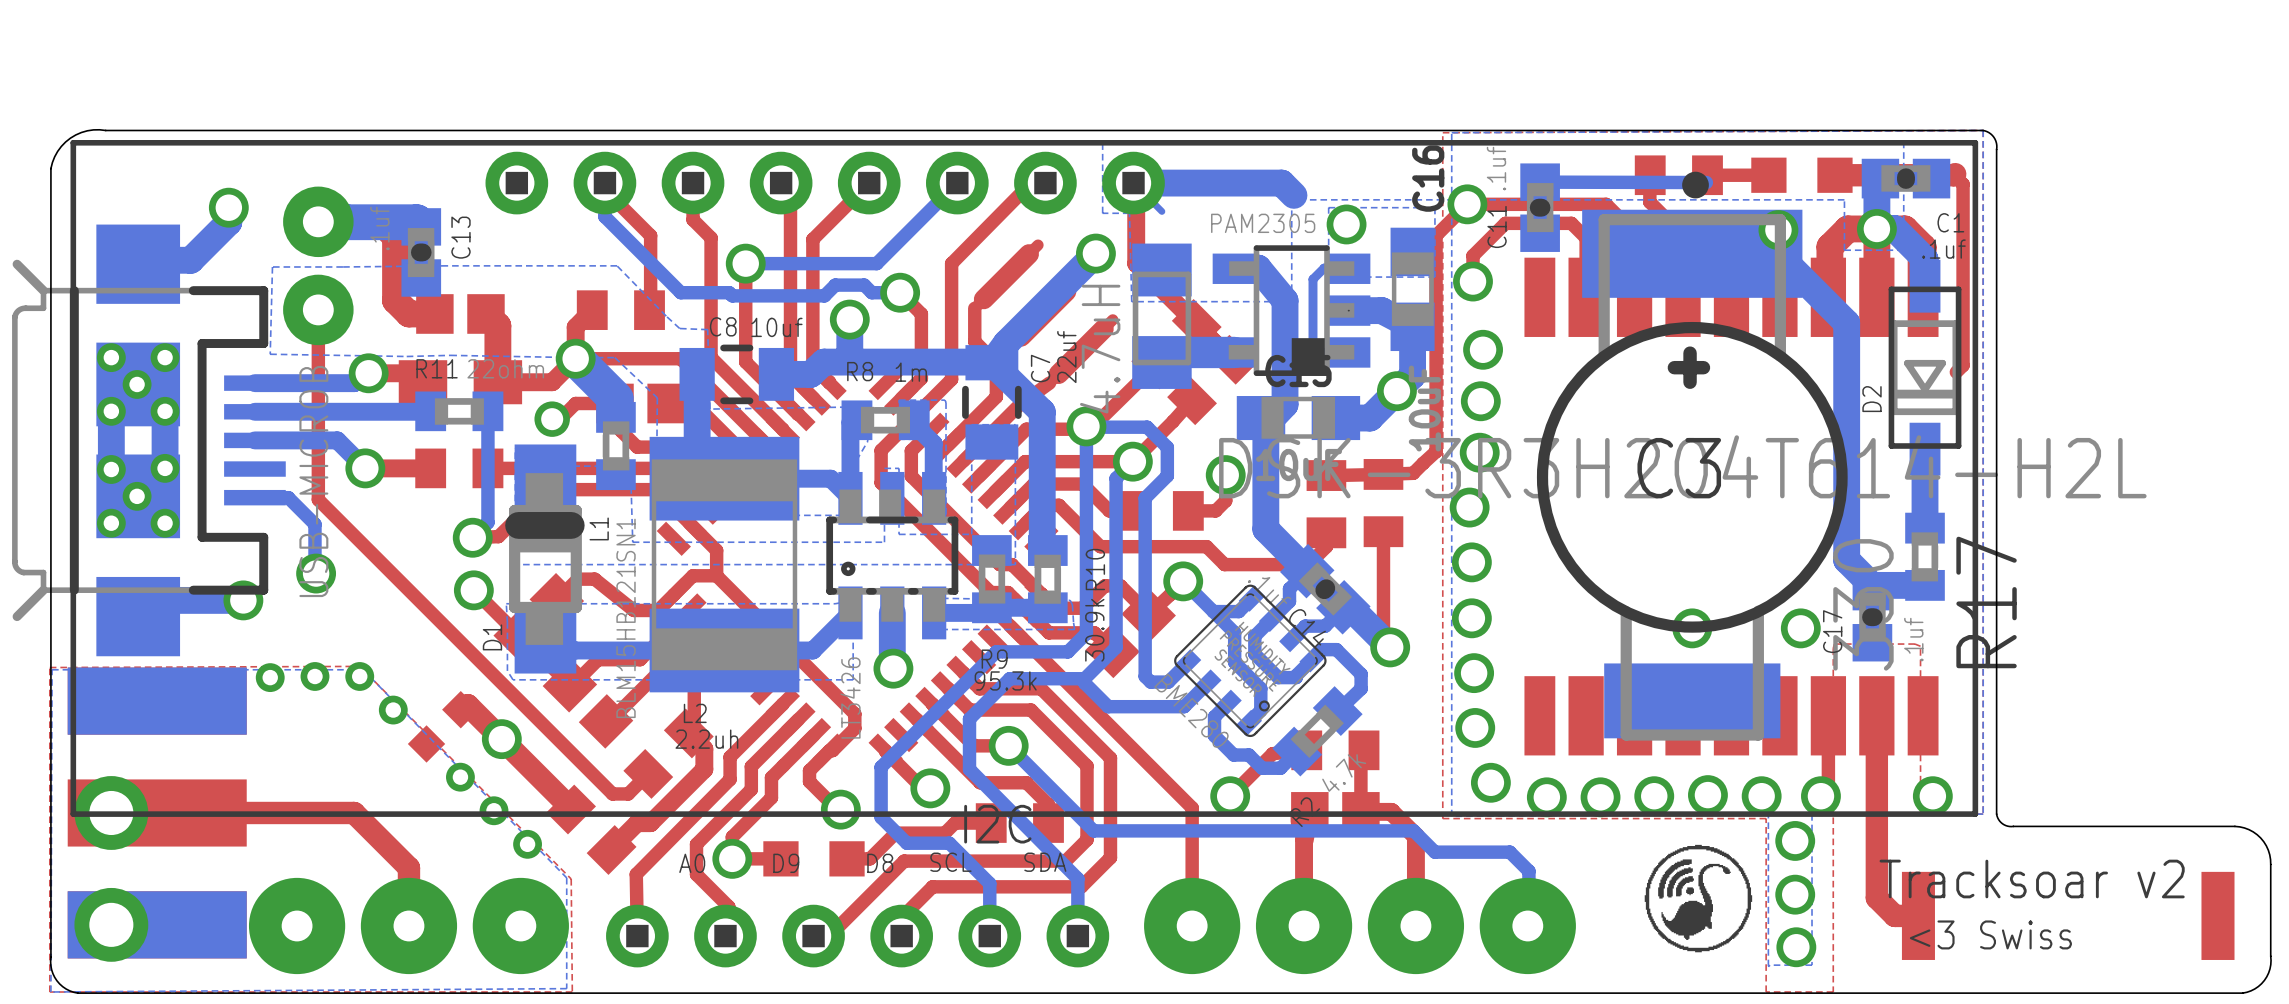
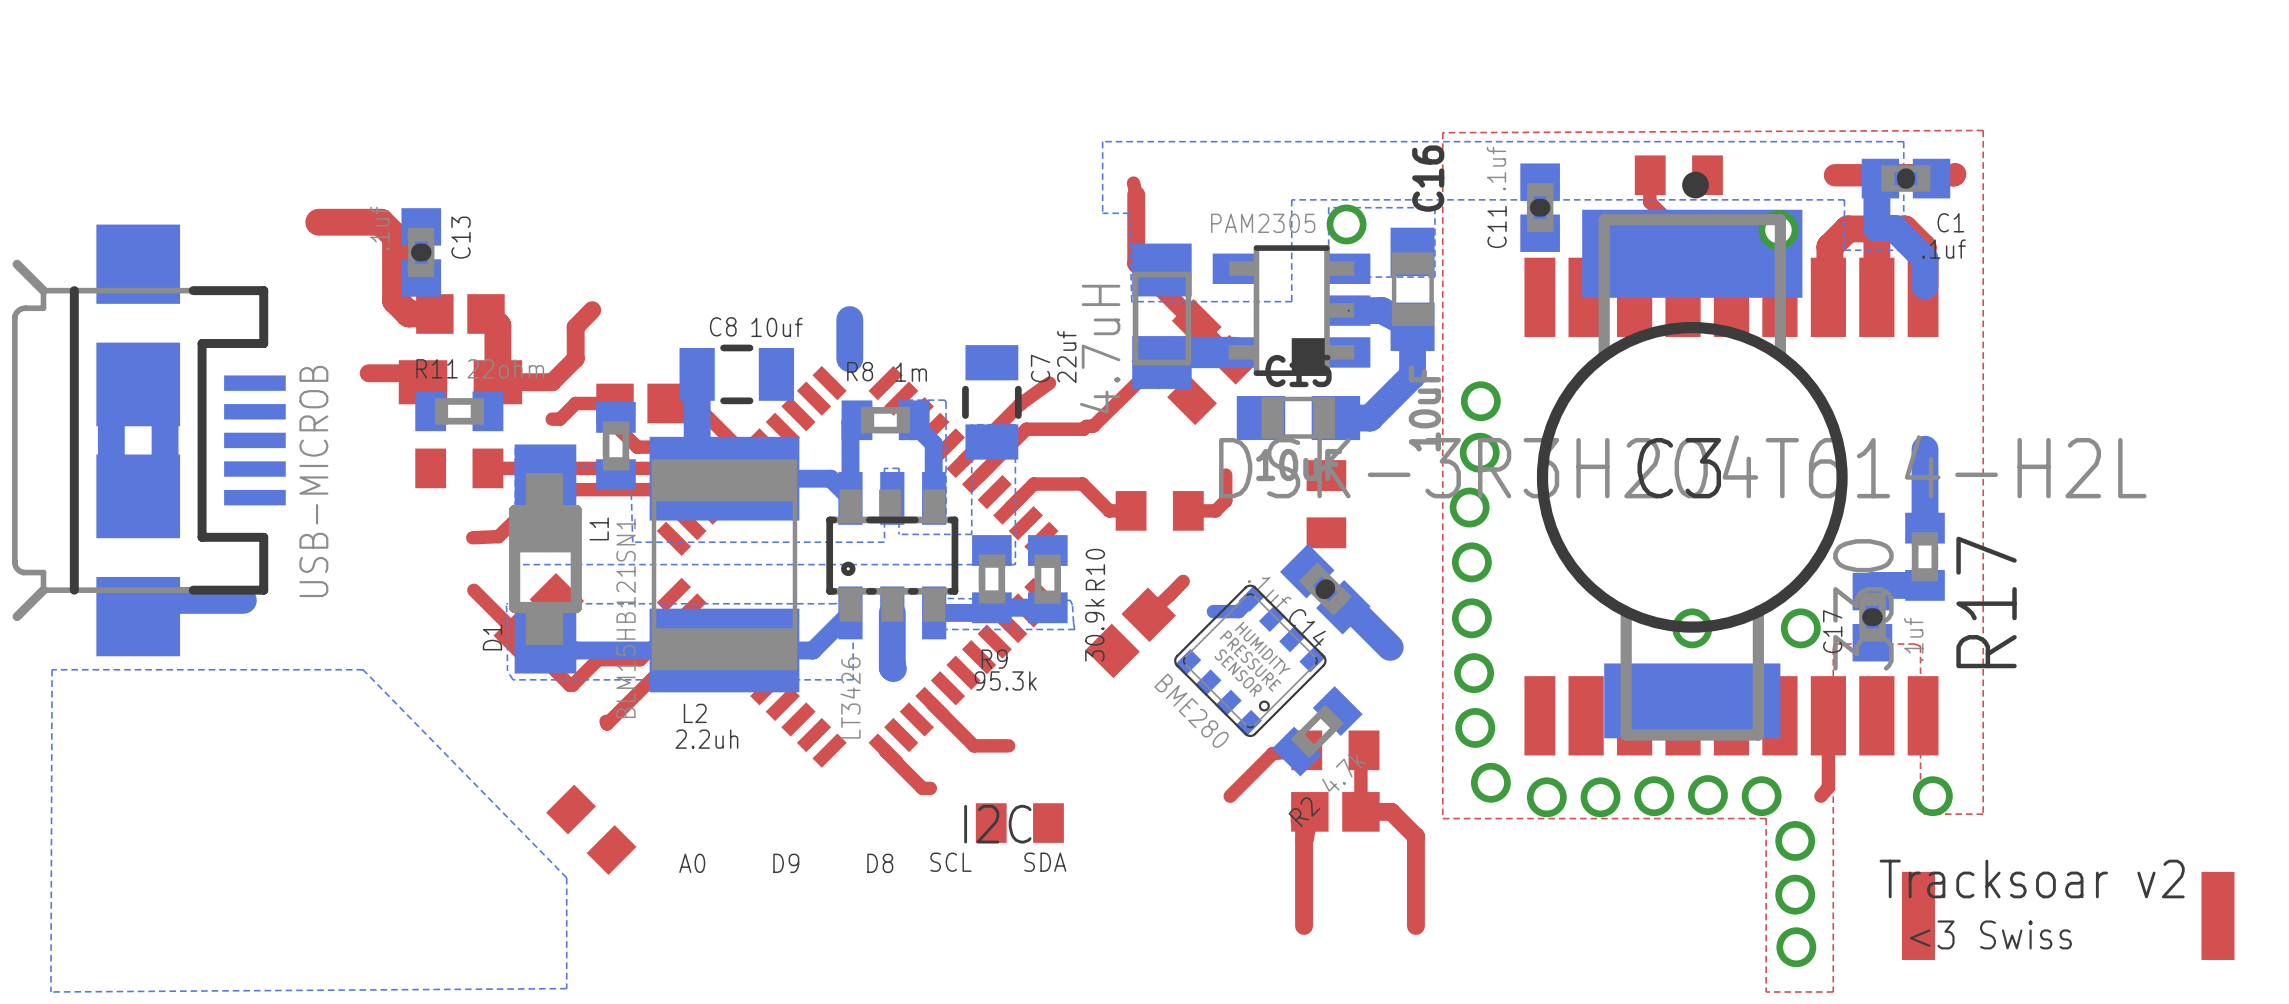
board edge: (1983, 130) (99, 129) (87, 130) (75, 134) (65, 142) (57, 151) (50, 168) (50, 961) (52, 973) (62, 986) (77, 993) (2242, 993) (2251, 990) (2264, 980) (2268, 973) (2271, 960) (2270, 859) (2263, 841) (2253, 831) (2234, 826) (2009, 826) (2002, 823) (1997, 815) (1996, 147) (1992, 135) (1983, 130) -> none
bottom zone outline: (1983, 130) (1451, 132) (1451, 816) (1768, 814) (1769, 966) (1812, 965) (1812, 814) (1983, 814) (1983, 130) -> none
top track: (1768, 175) (1707, 175) -> none
part: (1801, 175) -> none
top track: (1954, 175) (1963, 184) (1963, 365) (1956, 372) -> none
bottom track: (1540, 182) (1706, 182) -> none
top track: (604, 183) (604, 189) (650, 235) (649, 310) -> none
bottom track: (604, 183) (604, 216) (680, 292) (729, 292) (732, 295) (824, 295) (835, 285) (864, 285) (871, 292) (900, 292) -> none
top track: (781, 183) (781, 199) (790, 208) (790, 375) (814, 398) -> none
part: (825, 183) -> none
top track: (869, 183) (812, 239) (812, 365) (829, 383) (825, 378) -> none
bottom track: (957, 183) (876, 263) (745, 262) -> none
top track: (1045, 183) (1031, 182) (951, 263) (951, 379) (916, 414) -> none
top track: (690, 185) (693, 183) (693, 219) (711, 237) (711, 357) (782, 429) -> none
bottom track: (1293, 195) (1281, 183) (1133, 183) (1161, 211) -> none
via: (1467, 204) -> none
bottom track: (228, 207) (228, 222) (190, 260) (142, 260) (138, 264) -> none
via: (228, 207) -> none
via: (1876, 228) -> none
bottom track: (1095, 253) (1006, 343) (991, 362) -> none
via: (1095, 253) -> none
bottom track: (1777, 253) (1846, 322) (1846, 560) (1872, 585) (1872, 591) -> none
top track: (745, 263) (745, 362) (797, 414) -> none
via: (745, 263) -> none
part: (318, 265) -> none
bottom zone outline: (617, 265) (679, 328) (707, 329) (709, 409) (867, 406) (867, 441) (856, 460) (856, 515) (656, 515) (657, 397) (614, 357) (270, 354) (272, 266) (617, 265) -> none
bottom track: (1234, 268) (1258, 268) (1285, 300) (1285, 404) (1265, 424) -> none
bottom track: (1348, 268) (1324, 268) (1312, 279) (1312, 343) (1322, 352) (1348, 352) -> none
top track: (1472, 281) (1472, 255) (1505, 223) (1571, 223) (1586, 238) (1586, 297) -> none
via: (1472, 281) -> none
top track: (900, 292) (921, 313) (921, 378) (901, 398) -> none
via: (900, 292) -> none
top track: (1634, 296) (1634, 232) (1606, 204) (1467, 204) (1436, 235) (1436, 451) (1413, 473) (1326, 475) -> none
top track: (974, 308) (974, 341) (996, 363) (996, 396) (947, 445) -> none
top track: (318, 309) (318, 499) (612, 793) (628, 793) (648, 773) -> none
part: (620, 310) -> none
part: (1043, 314) -> none
via: (849, 319) -> none
via: (1483, 349) -> none
line: (1690, 353) (1690, 382) -> none
via: (111, 357) -> none
via: (165, 357) -> none
top track: (575, 358) (680, 358) (767, 445) -> none
bottom track: (575, 358) (615, 399) (615, 417) -> none
via: (575, 358) -> none
bottom track: (991, 362) (1042, 411) (1042, 550) (1047, 550) -> none
bottom track: (991, 362) (824, 362) (810, 374) (776, 374) -> none
line: (1703, 367) (1674, 367) -> none
D2: (1925, 367) -> none
bottom track: (368, 373) (354, 383) (254, 383) -> none
via: (368, 373) -> none
via: (137, 384) -> none
via: (1396, 391) -> none
top track: (1192, 400) (1132, 461) (1025, 461) (994, 492) -> none
via: (111, 411) -> none
via: (165, 411) -> none
bottom track: (430, 411) (254, 411) -> none
bottom track: (485, 414) (487, 411) (487, 522) (472, 537) -> none
top track: (916, 414) (881, 450) (881, 482) (990, 592) (1007, 592) (1025, 610) -> none
via: (552, 419) -> none
bottom track: (1265, 424) (1265, 529) (1307, 571) (1289, 588) (1289, 601) (1254, 636) (1254, 654) (1278, 677) (1296, 677) (1322, 649) (1336, 649) (1361, 674) (1361, 688) (1337, 711) -> none
via: (1086, 426) -> none
top track: (932, 429) (911, 450) (911, 476) (999, 564) (1012, 564) (1055, 608) (1082, 608) (1104, 585) (1120, 585) (1148, 613) -> none
bottom track: (254, 440) (337, 440) (365, 468) -> none
bottom track: (1132, 460) (1116, 478) (1116, 647) (1084, 678) -> none
via: (1132, 461) -> none
via: (165, 468) -> none
via: (365, 468) -> none
top track: (430, 468) (365, 468) -> none
via: (111, 469) -> none
via: (1225, 475) -> none
via: (137, 496) -> none
bottom track: (254, 497) (288, 497) (314, 524) (316, 573) -> none
part: (1383, 503) -> none
via: (111, 523) -> none
via: (165, 523) -> none
top track: (689, 523) (716, 550) (716, 575) -> none
top track: (1025, 523) (1043, 505) (1059, 505) (1100, 546) (1206, 546) (1224, 564) (1308, 564) (1326, 546) (1326, 532) -> none
line: (571, 525) (518, 525) -> none
top track: (1383, 531) (1383, 640) (1390, 647) -> none
via: (472, 537) -> none
part: (1024, 557) -> none
via: (316, 573) -> none
top track: (716, 575) (692, 575) (658, 610) (633, 610) (594, 579) (577, 579) (556, 600) -> none
top track: (716, 575) (854, 713) (854, 728) (809, 770) (809, 781) (837, 809) (840, 809) -> none
bottom track: (1183, 581) (1234, 632) (1234, 662) (1260, 688) (1260, 710) (1248, 723) -> none
via: (1183, 581) -> none
via: (473, 590) -> none
via: (243, 600) -> none
bottom track: (1343, 608) (1325, 626) (1305, 626) (1292, 639) -> none
top track: (1026, 610) (1048, 632) (1094, 632) (1112, 650) -> none
top track: (1010, 626) (1192, 807) (1192, 925) -> none
top track: (720, 641) (694, 667) (694, 727) (688, 733) (704, 749) (704, 769) (650, 823) (637, 823) (611, 850) -> none
via: (1390, 647) -> none
bottom track: (1188, 662) (1168, 682) (1150, 682) (1145, 676) (1145, 498) (1167, 475) (1167, 447) (1147, 427) (1086, 426) (1086, 633) (1067, 651) (996, 651) (881, 767) (881, 817) (906, 843) (949, 843) (989, 883) (989, 936) -> none
top zone outline: (359, 666) (49, 667) (49, 992) (572, 992) (571, 879) (359, 666) -> none
via: (893, 668) -> none
top track: (963, 672) (979, 688) (1041, 688) (1110, 758) (1110, 857) (1081, 886) (932, 886) (905, 914) (901, 936) -> none
via: (314, 676) -> none
via: (359, 676) -> none
via: (270, 677) -> none
bottom track: (1084, 678) (1009, 678) (969, 719) (969, 769) (1077, 878) (1077, 936) -> none
bottom track: (1084, 678) (1084, 683) (1108, 706) (1184, 706) (1208, 682) -> none
top track: (947, 688) (969, 710) (1031, 710) (1086, 765) (1086, 839) (1065, 861) (904, 861) (828, 937) (813, 936) -> none
bottom track: (1228, 702) (1214, 716) (1214, 735) (1233, 755) (1248, 755) (1262, 768) (1280, 768) (1297, 751) -> none
part: (587, 703) -> none
top track: (782, 704) (730, 757) (730, 779) (636, 874) (637, 936) -> none
top track: (460, 709) (467, 705) (571, 809) -> none
via: (393, 710) -> none
top track: (1878, 717) (1876, 715) (1876, 897) (1894, 915) (1918, 915) -> none
top track: (798, 719) (751, 766) (751, 789) (696, 844) (696, 874) (728, 906) (725, 936) -> none
top track: (916, 719) (980, 782) (1026, 782) (1048, 804) (1048, 823) -> none
part: (443, 726) -> none
top track: (814, 735) (771, 777) (771, 797) (732, 836) (732, 858) (780, 858) -> none
via: (501, 739) -> none
bottom track: (1008, 745) (1093, 830) (1413, 830) (1434, 852) (1509, 852) (1528, 871) (1527, 925) -> none
via: (1008, 745) -> none
part: (668, 753) -> none
via: (460, 777) -> none
via: (930, 788) -> none
via: (1230, 796) -> none
via: (1820, 796) -> none
via: (840, 809) -> none
via: (494, 810) -> none
top track: (110, 812) (354, 812) (408, 867) (408, 925) -> none
via: (111, 812) -> none
part: (157, 812) -> none
top track: (991, 823) (954, 823) (944, 833) (895, 833) (869, 858) (847, 858) -> none
via: (527, 844) -> none
drawing: [1644, 844, 1753, 953] -> none
via: (732, 858) -> none
part: (813, 858) -> none
via: (111, 924) -> none
part: (857, 936) -> none

